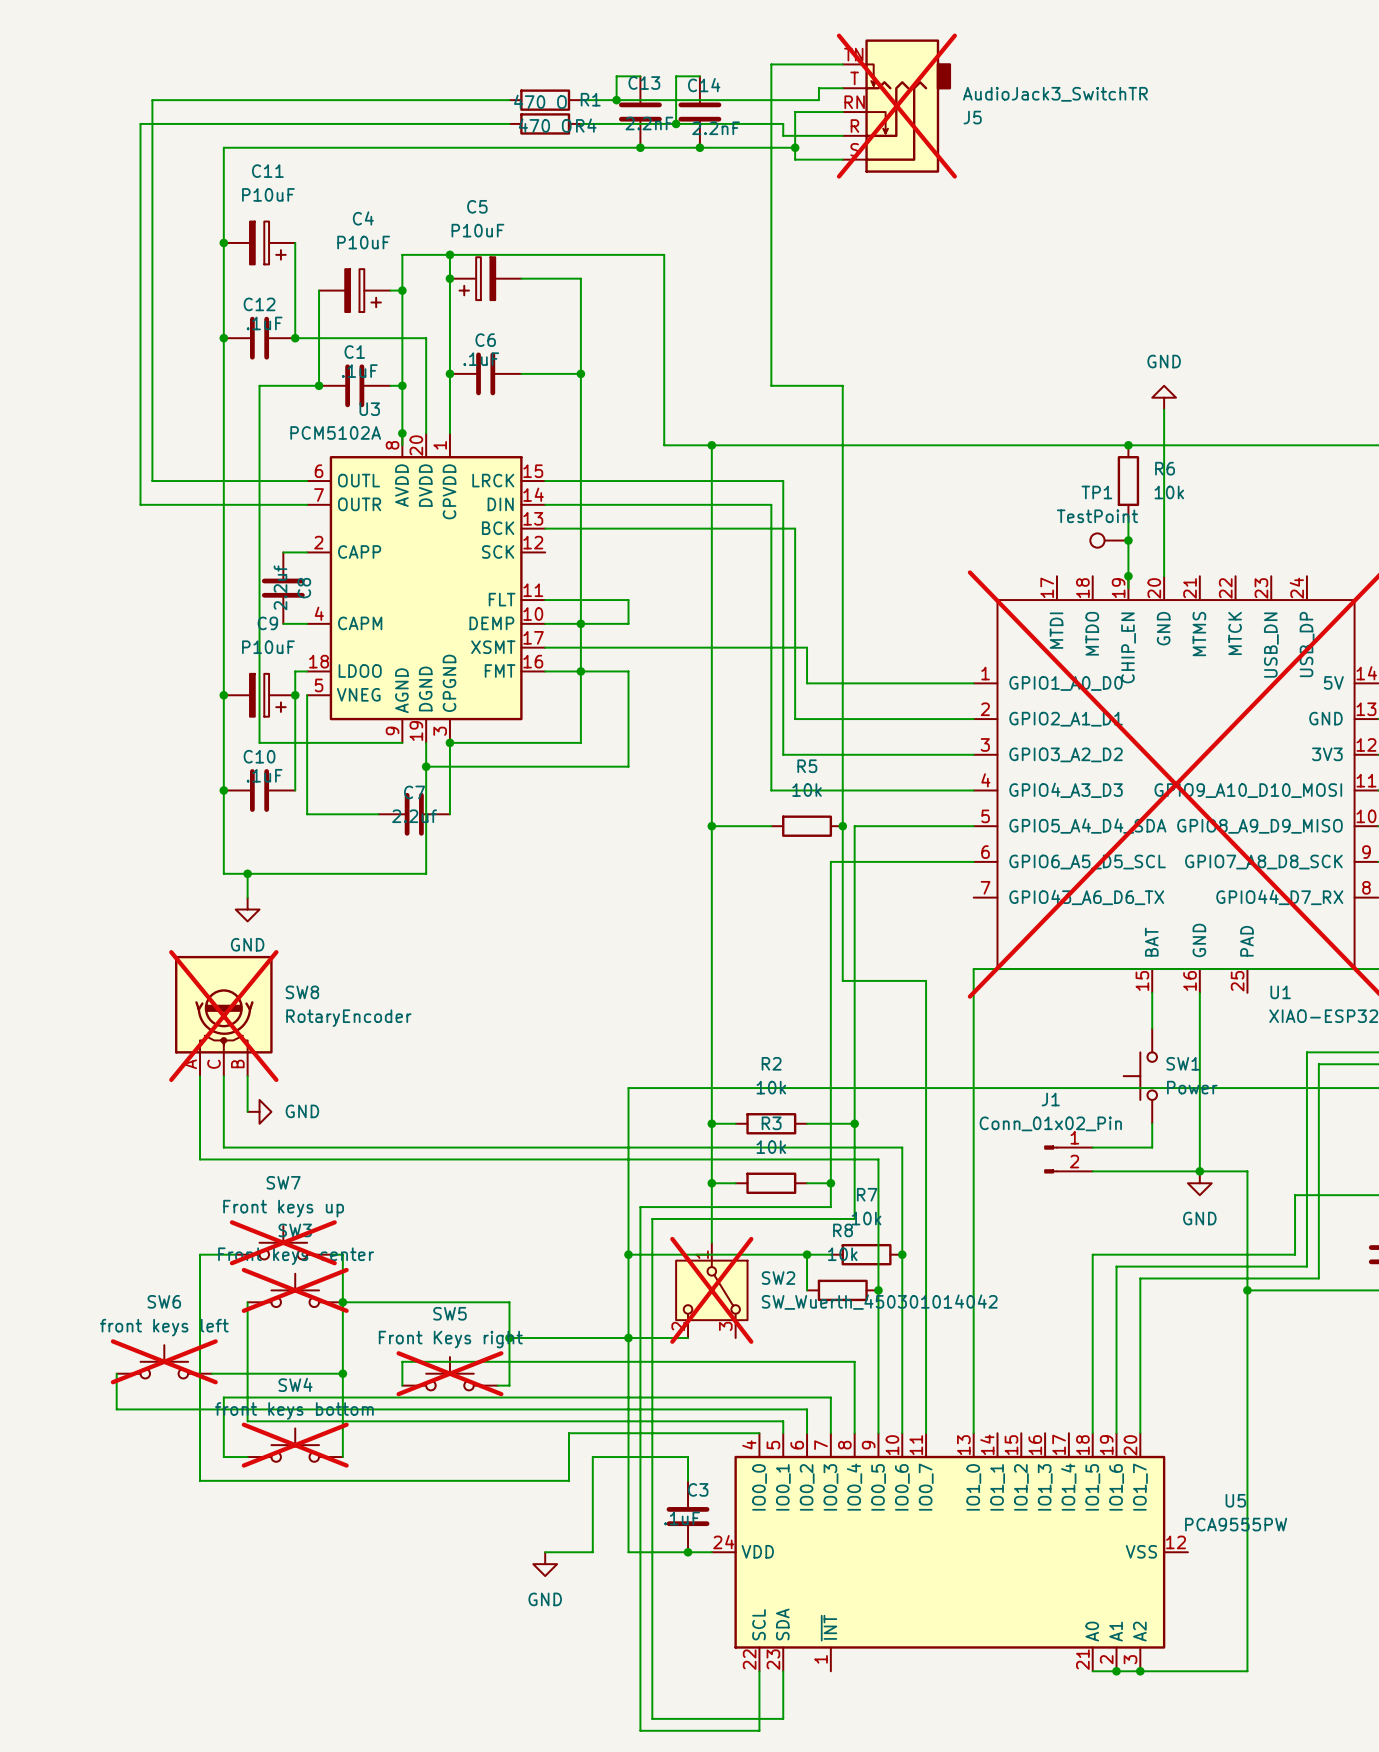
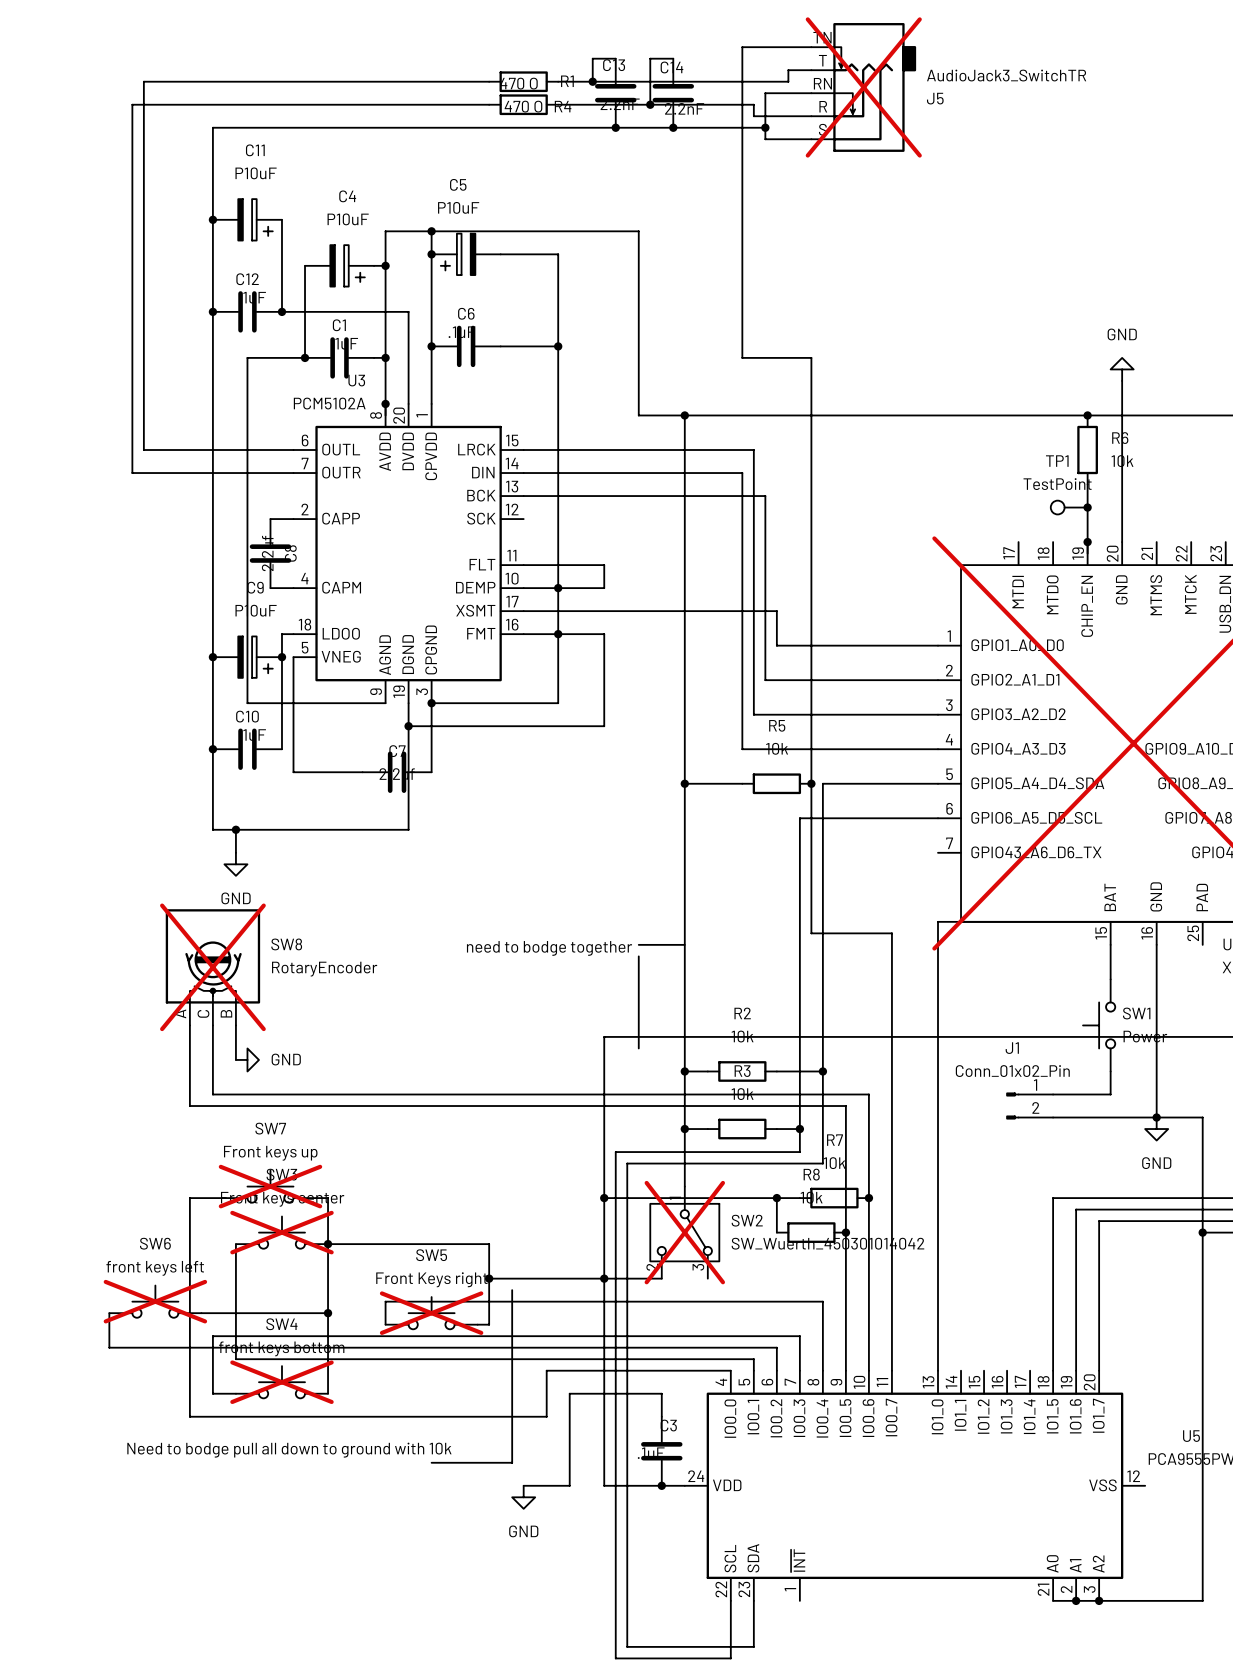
line: none -> (638, 944) (684, 944)
text: none -> need to bodge together (549, 948)
line: none -> (638, 956) (638, 1048)
line: none -> (512, 1290) (512, 1462) (431, 1462)
text: none -> Need to bodge pull all down to ground with 10k (289, 1450)

